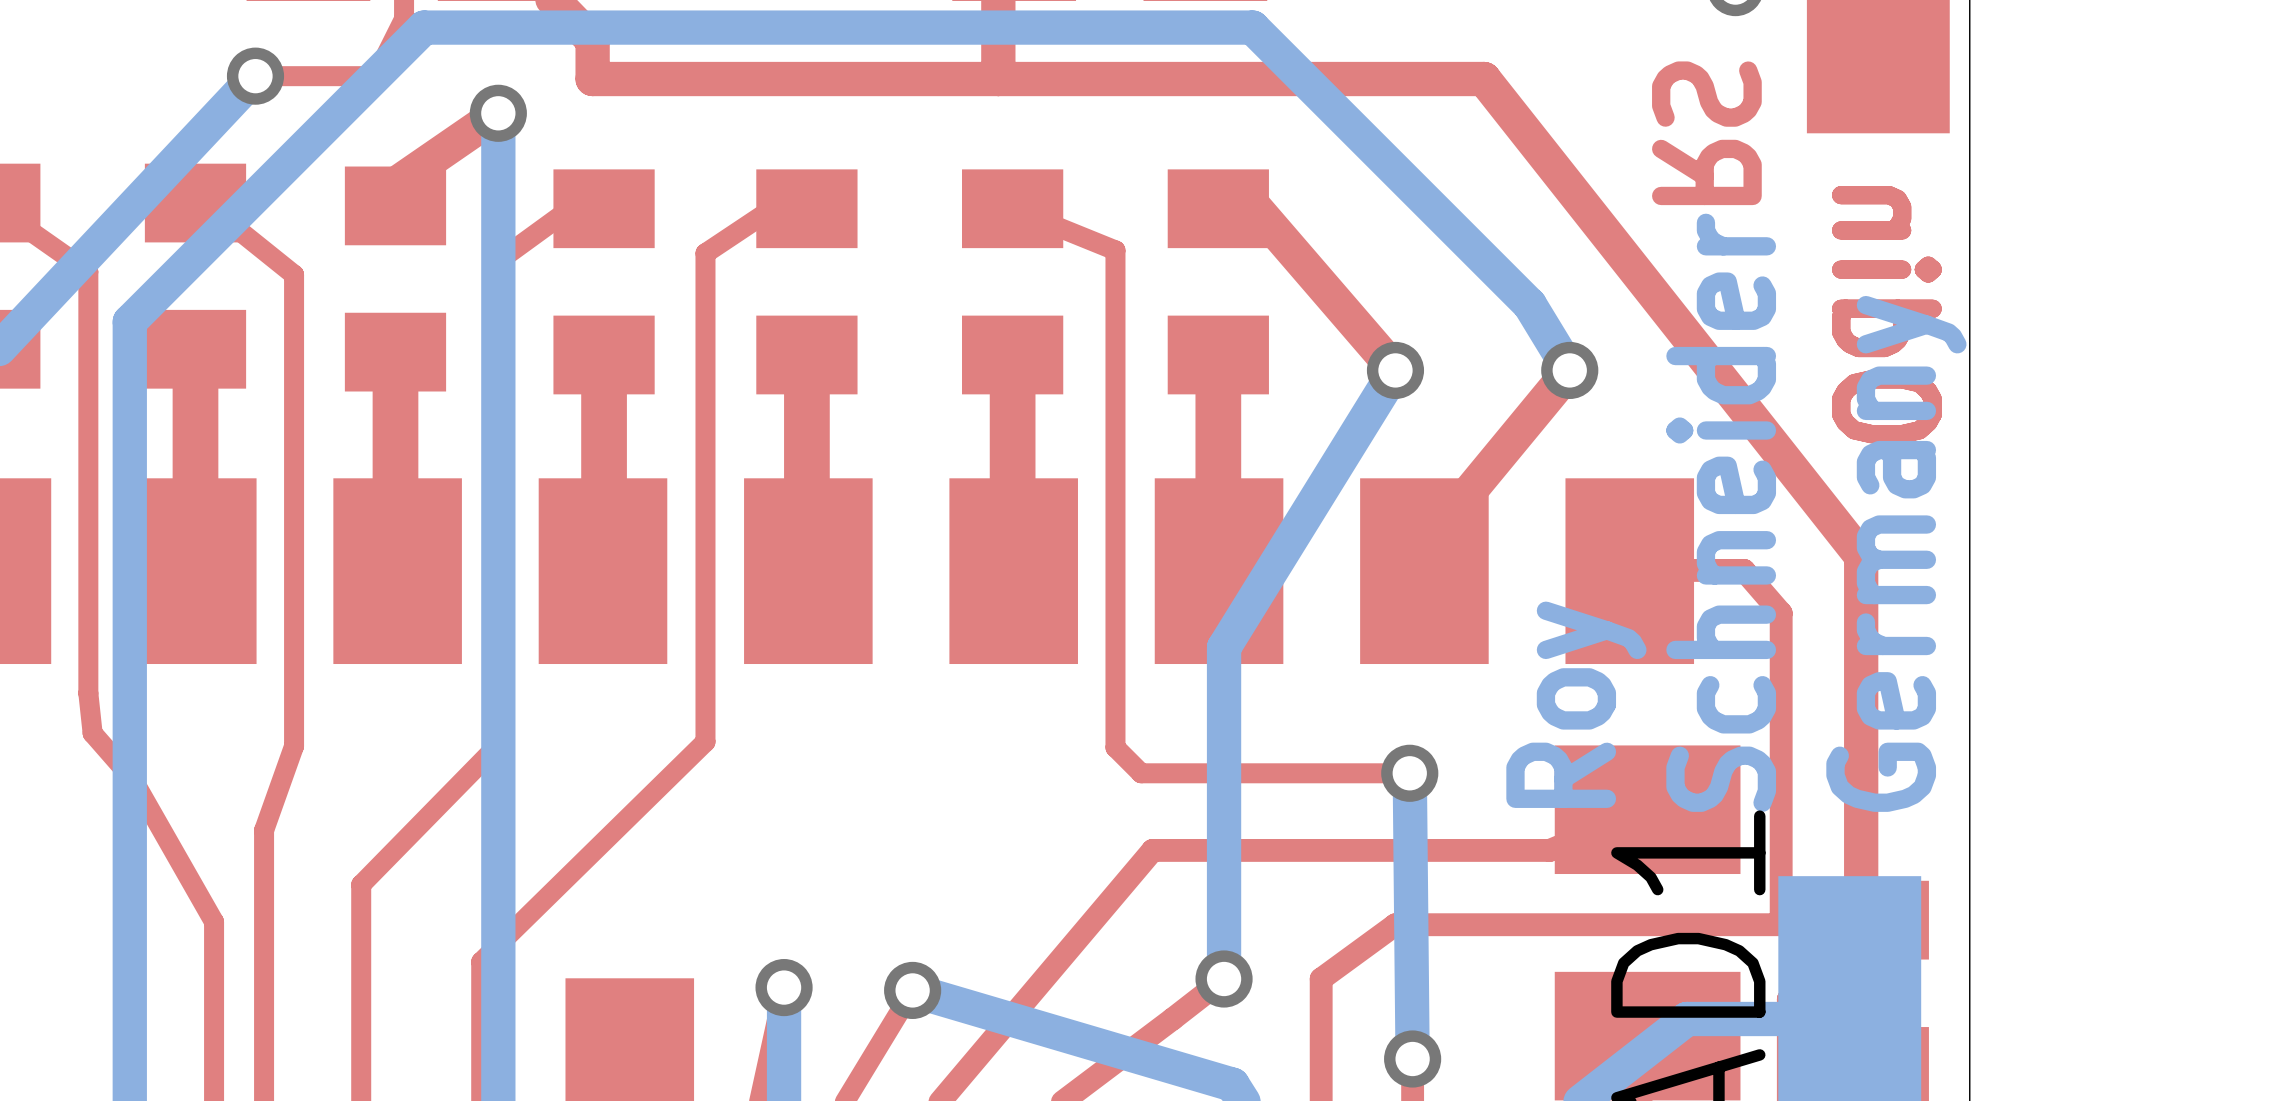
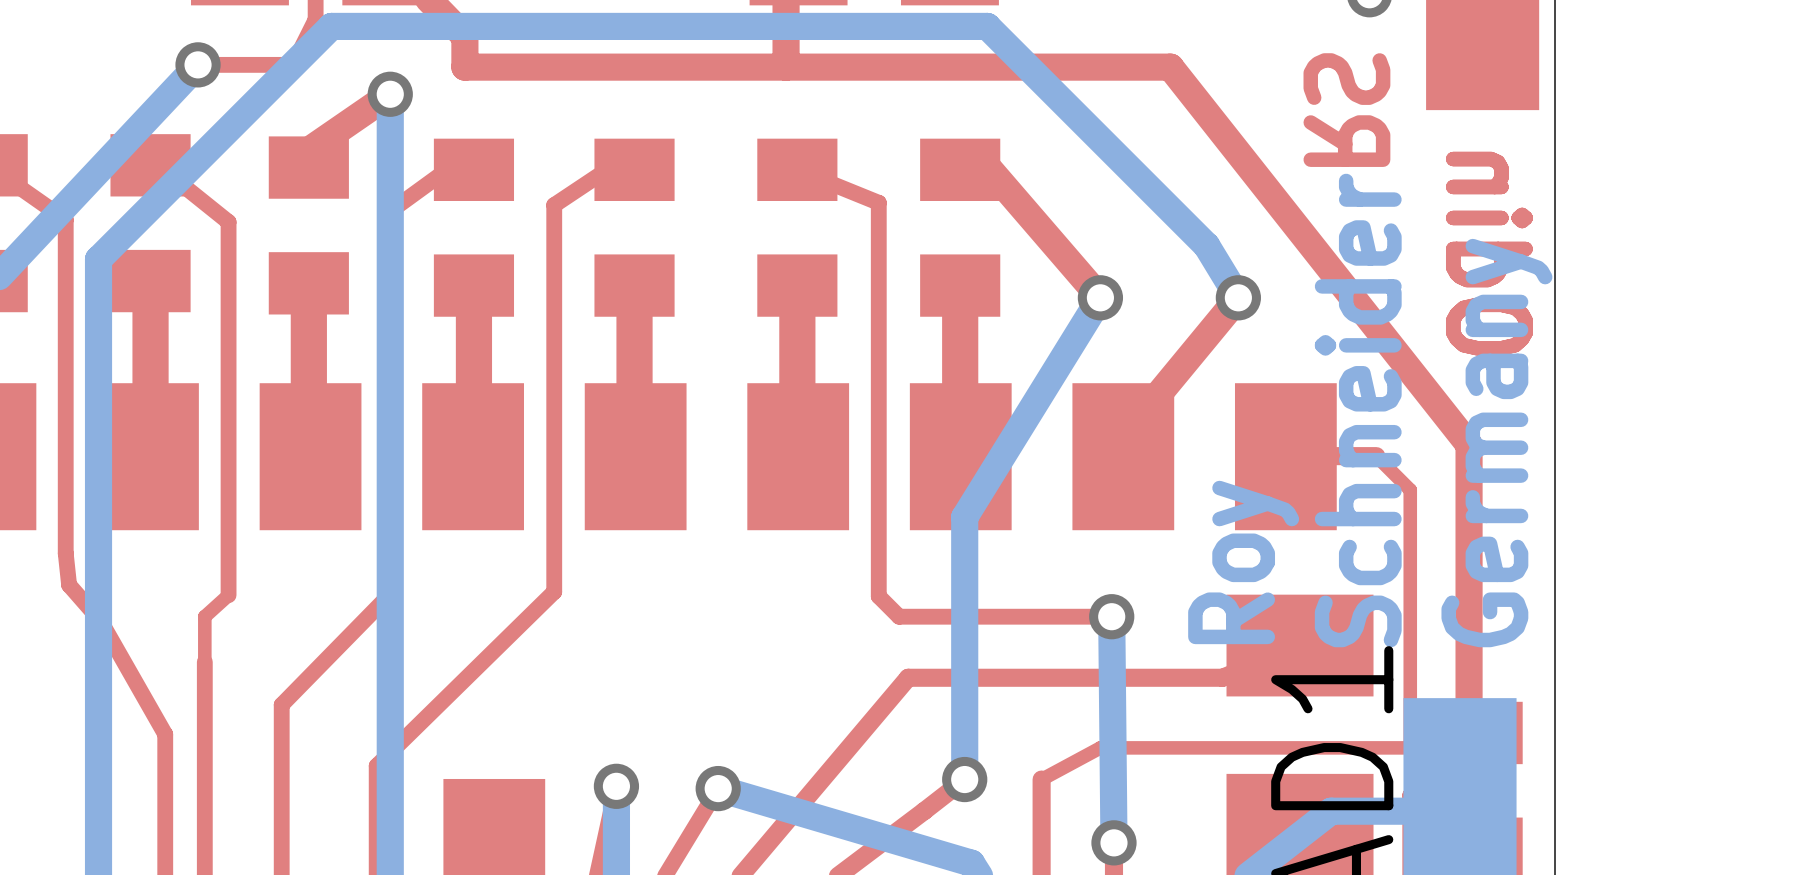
top track: (1744, 570) (1781, 613) (1781, 924) (1395, 924) (1321, 979) -> (1376, 456) (1410, 490) (1410, 747) (1100, 747) (1041, 779)
top track: (294, 746) (264, 830) -> (228, 595) (204, 616) (204, 661)

